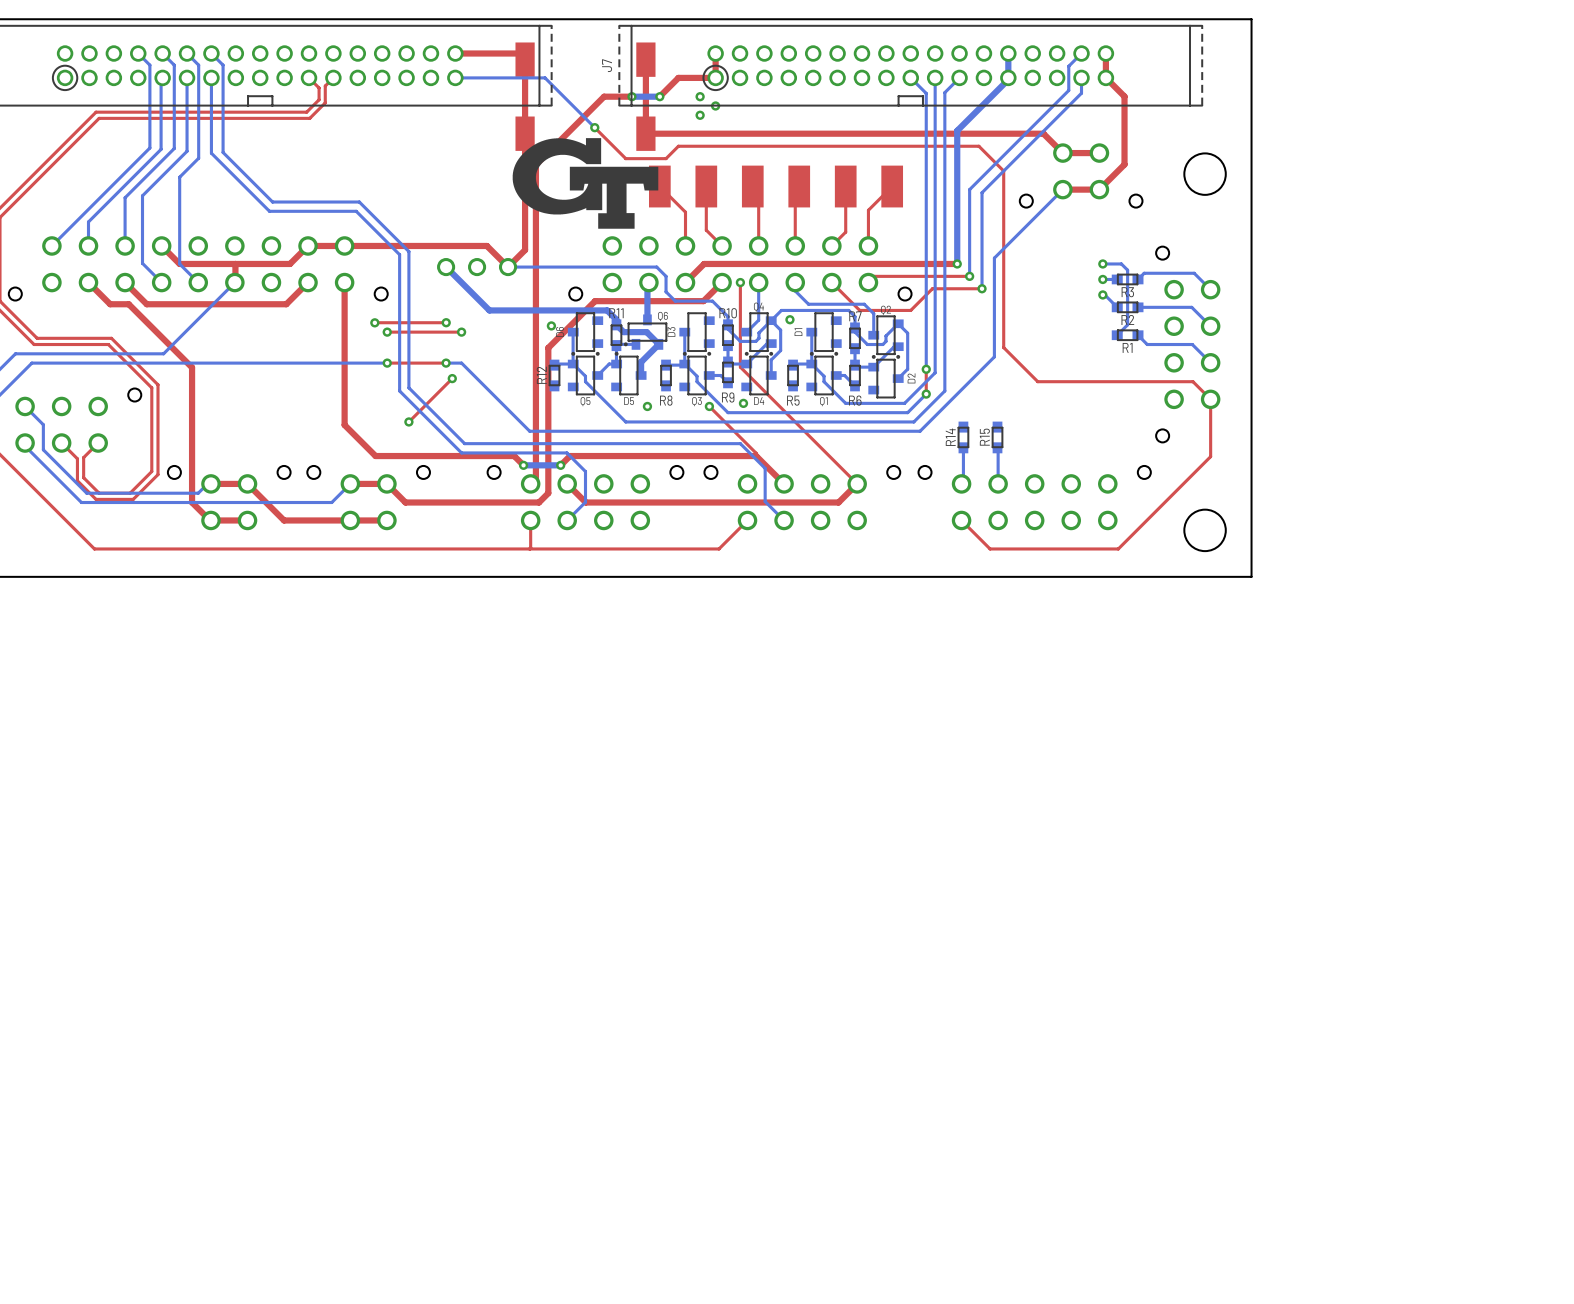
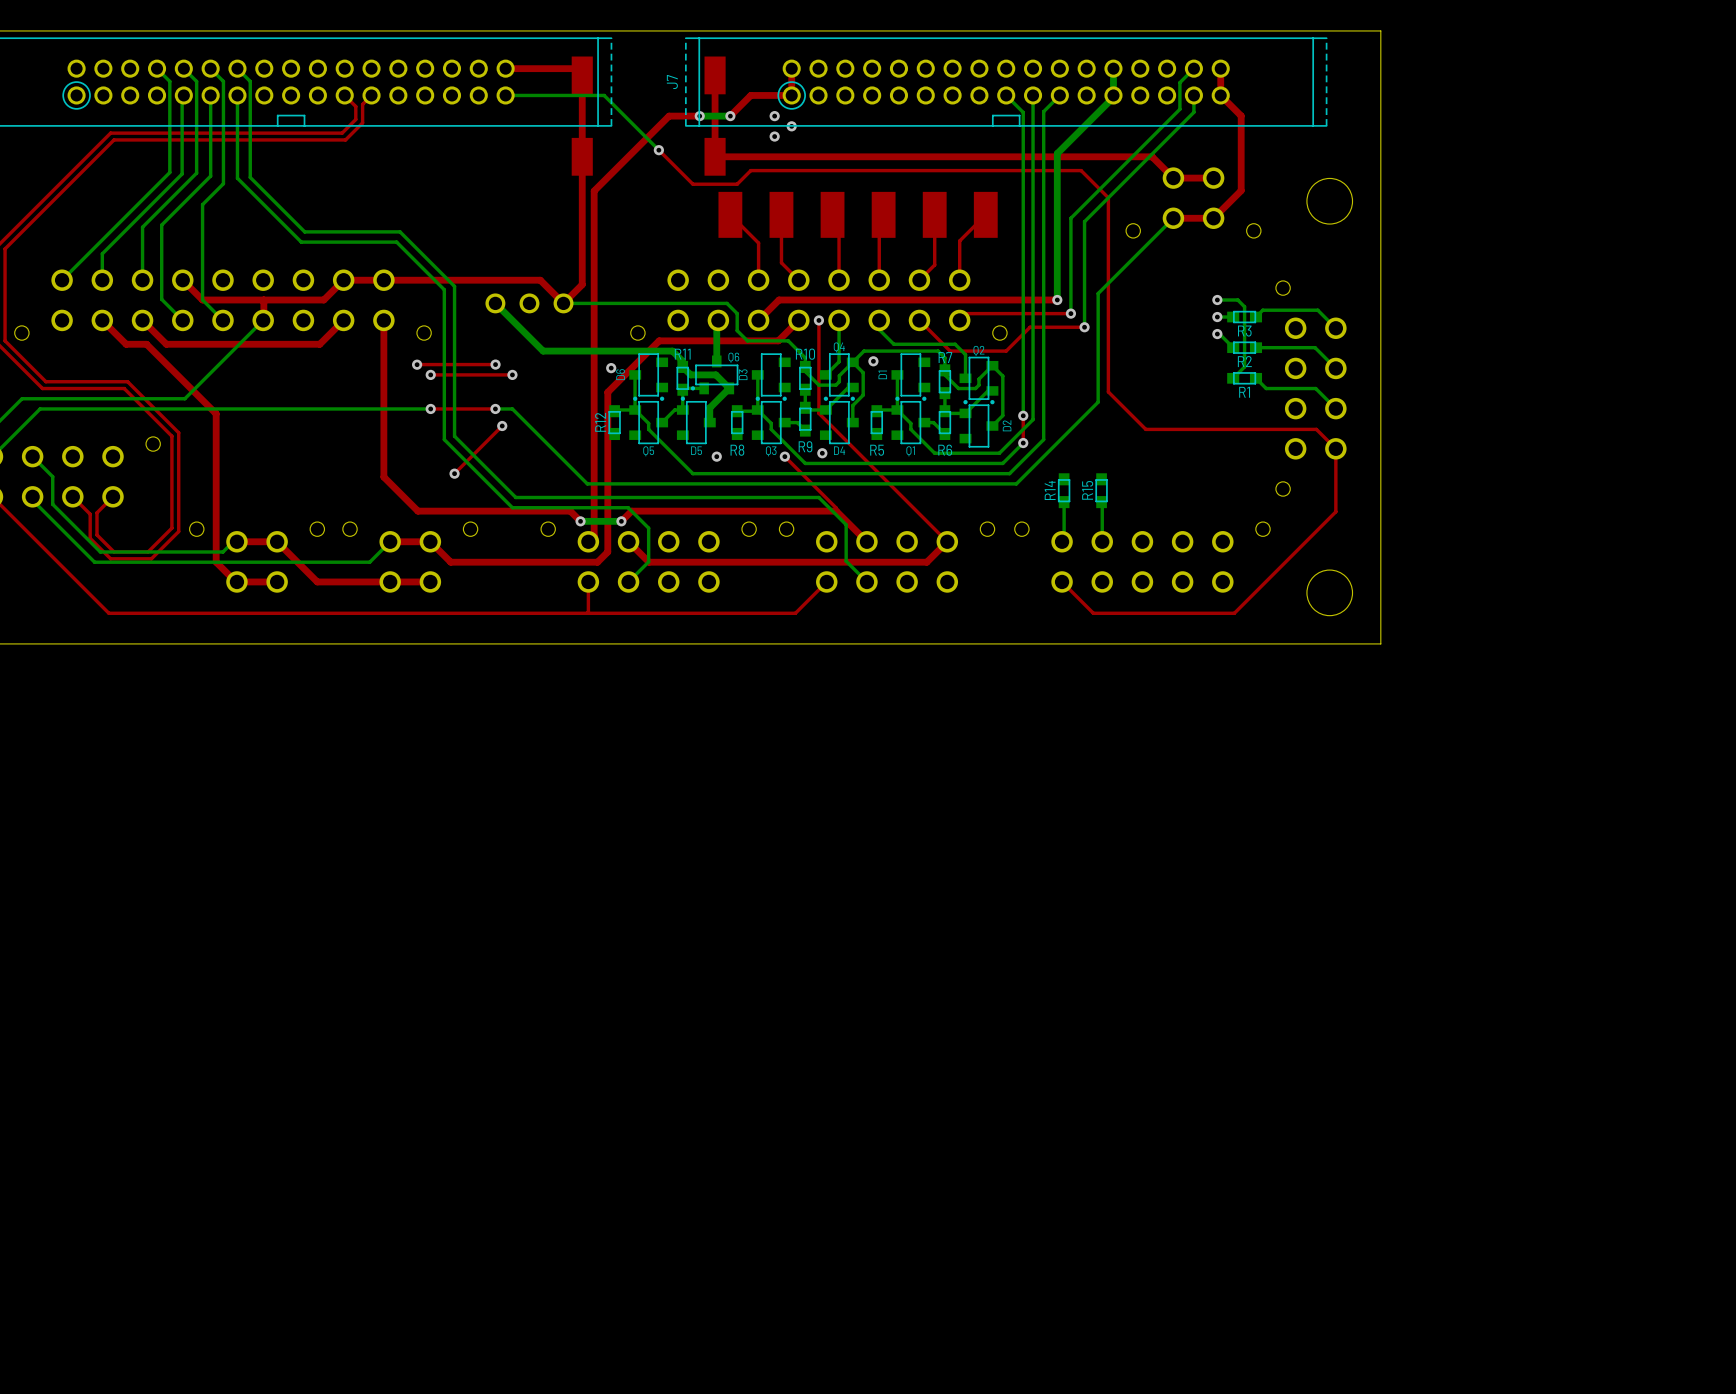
drawing: [512, 138, 659, 229] -> none

